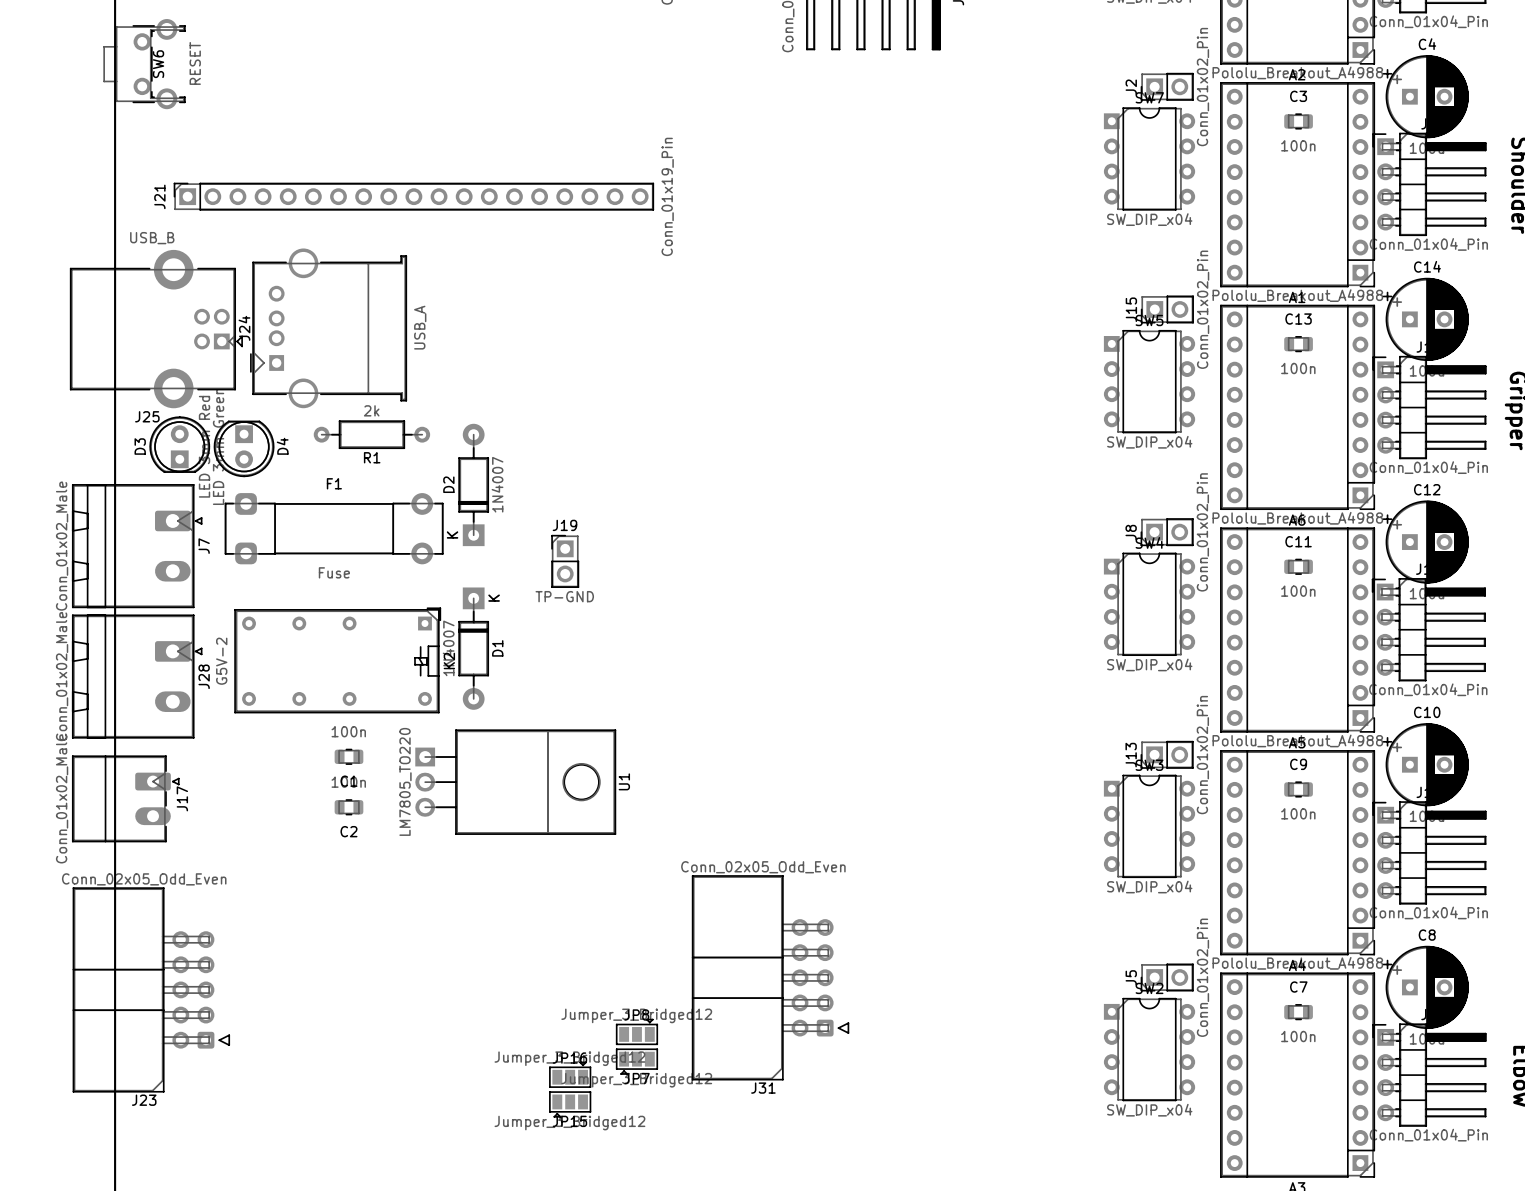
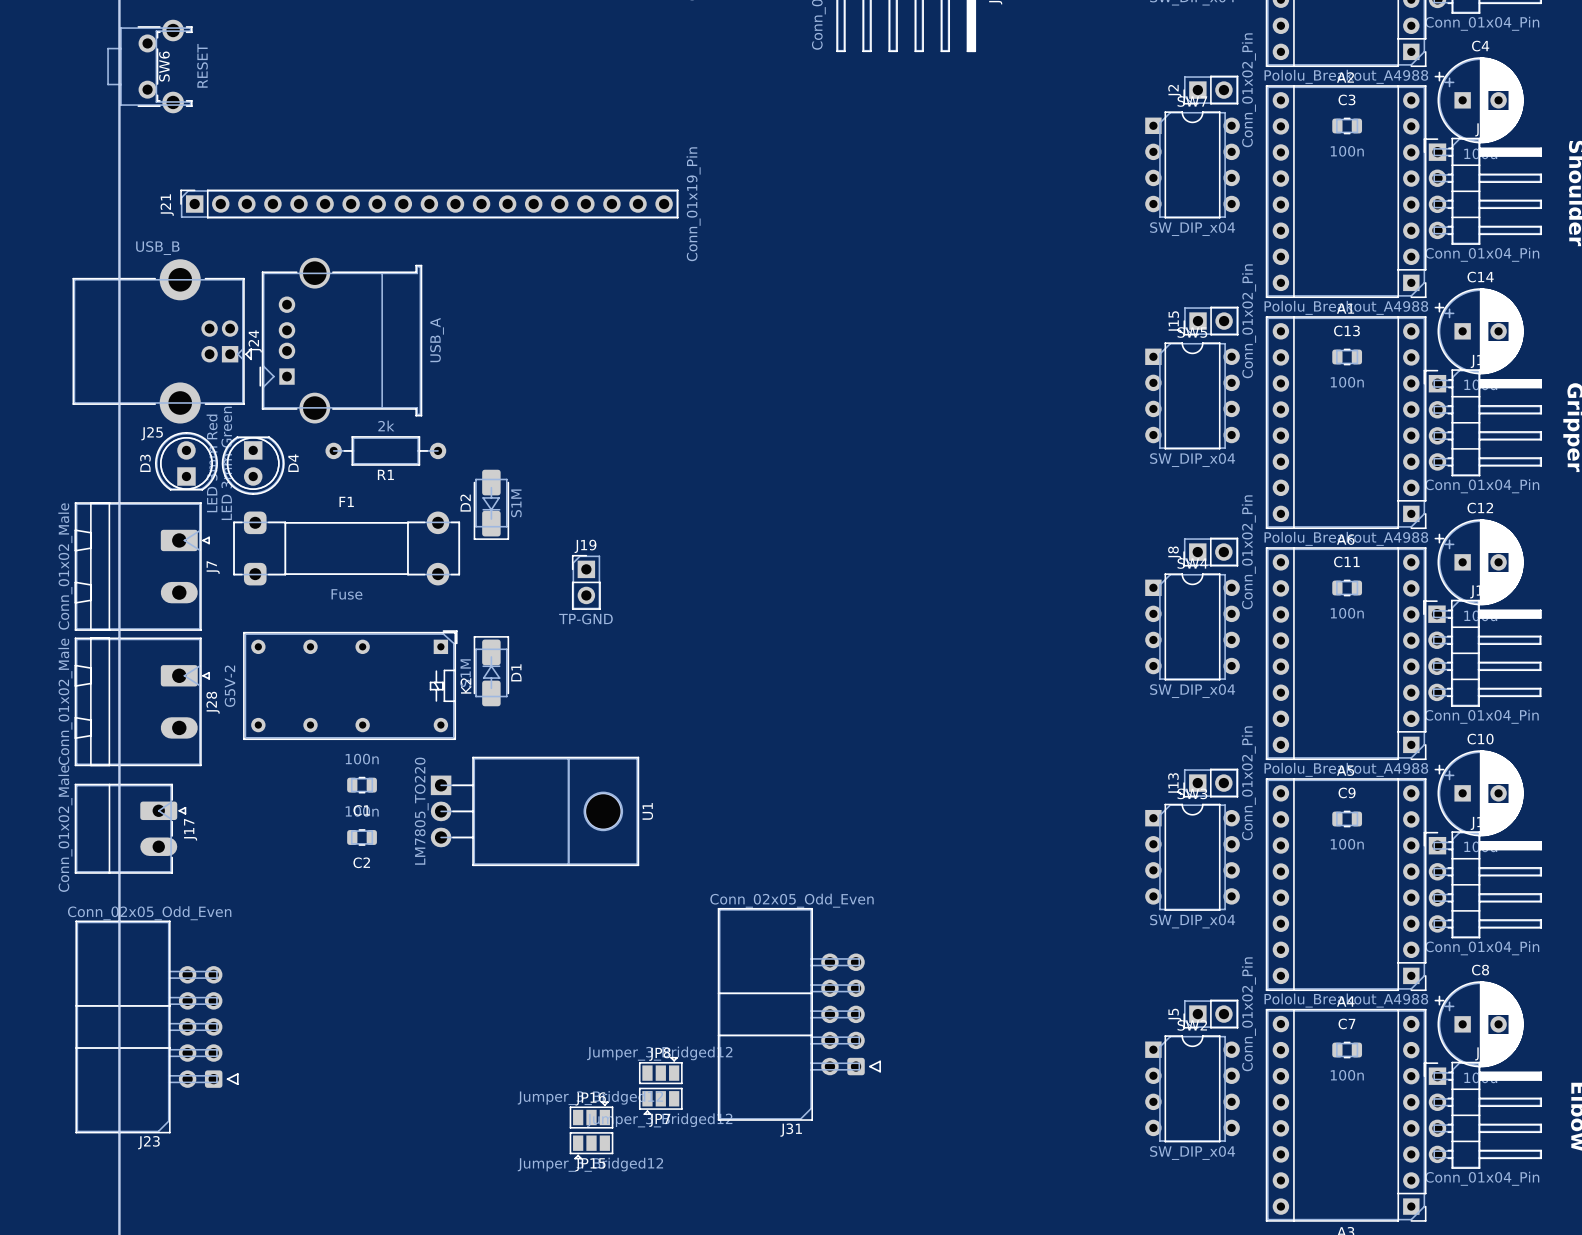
D2 footprint: [458, 423, 489, 547] -> [473, 469, 509, 540]
D2 value: 1N4007 (497, 484) -> S1M (516, 503)
D1 footprint: [458, 587, 489, 710] -> [473, 636, 509, 707]
D1 value: 1N4007 (448, 648) -> S1M (465, 673)

